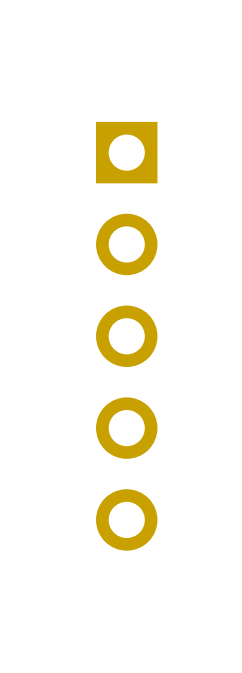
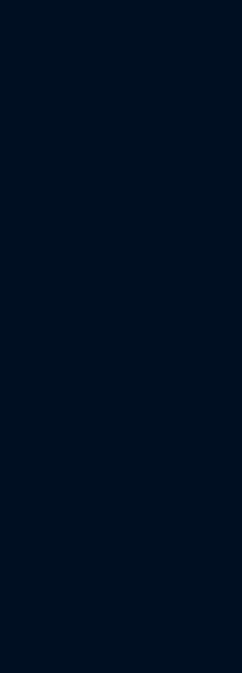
part: (126, 336) -> none

